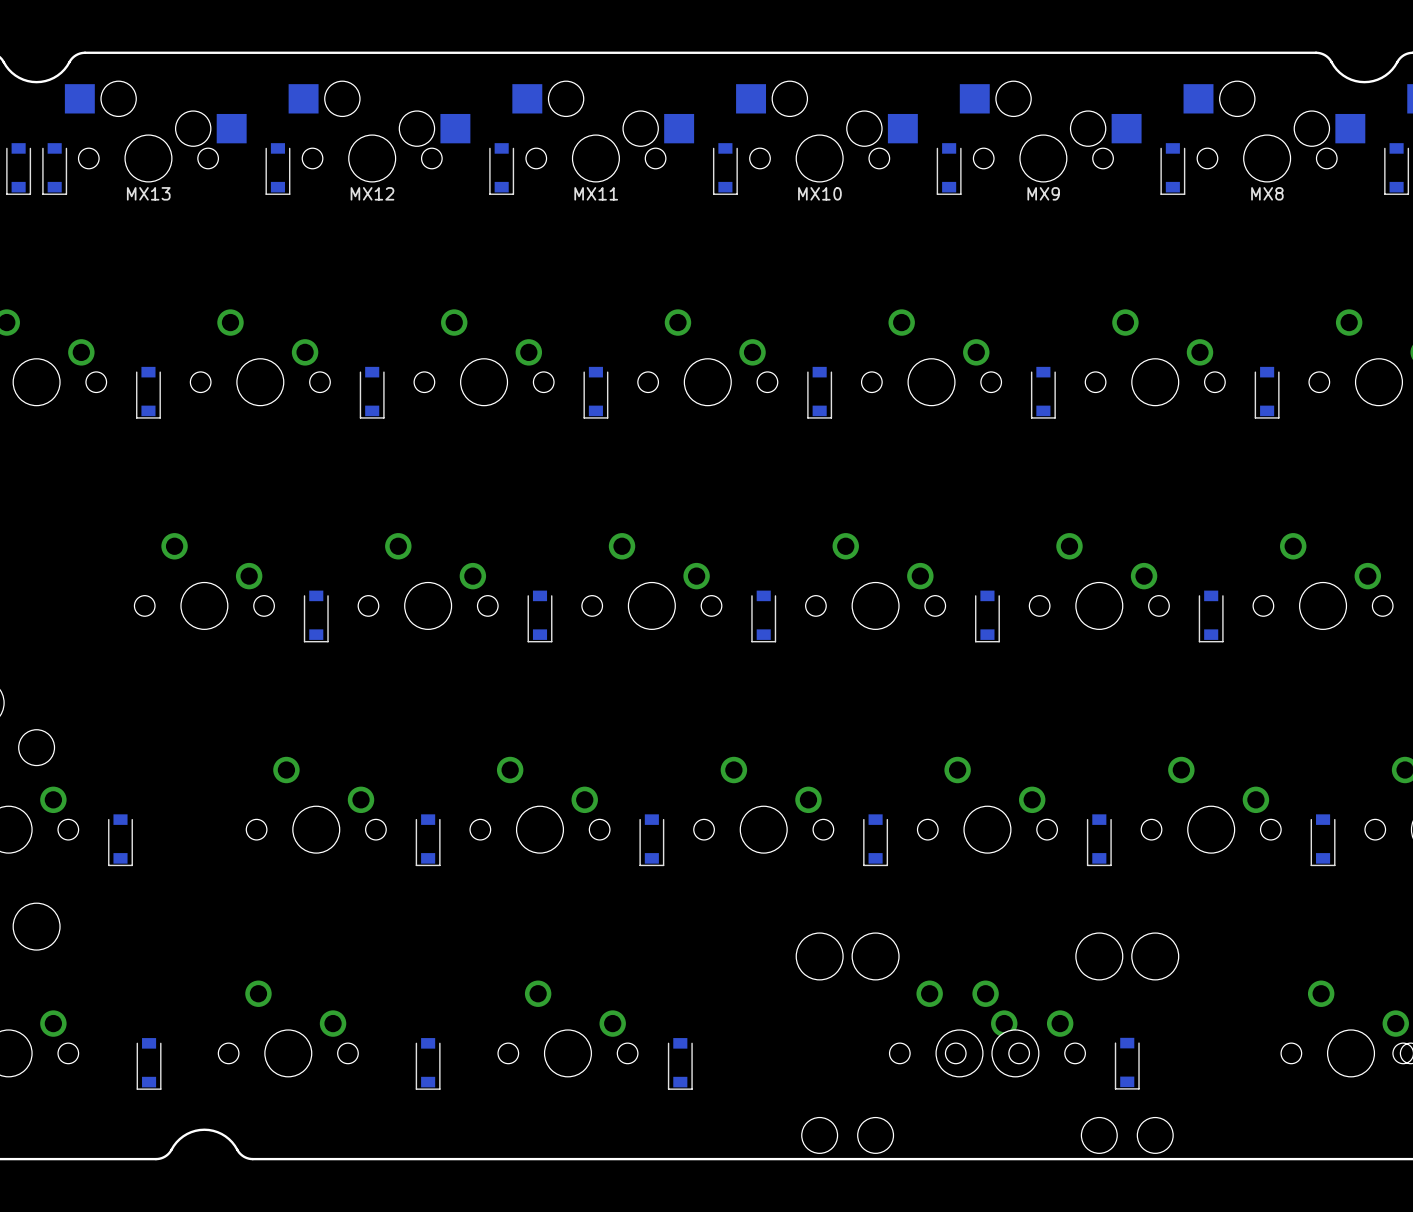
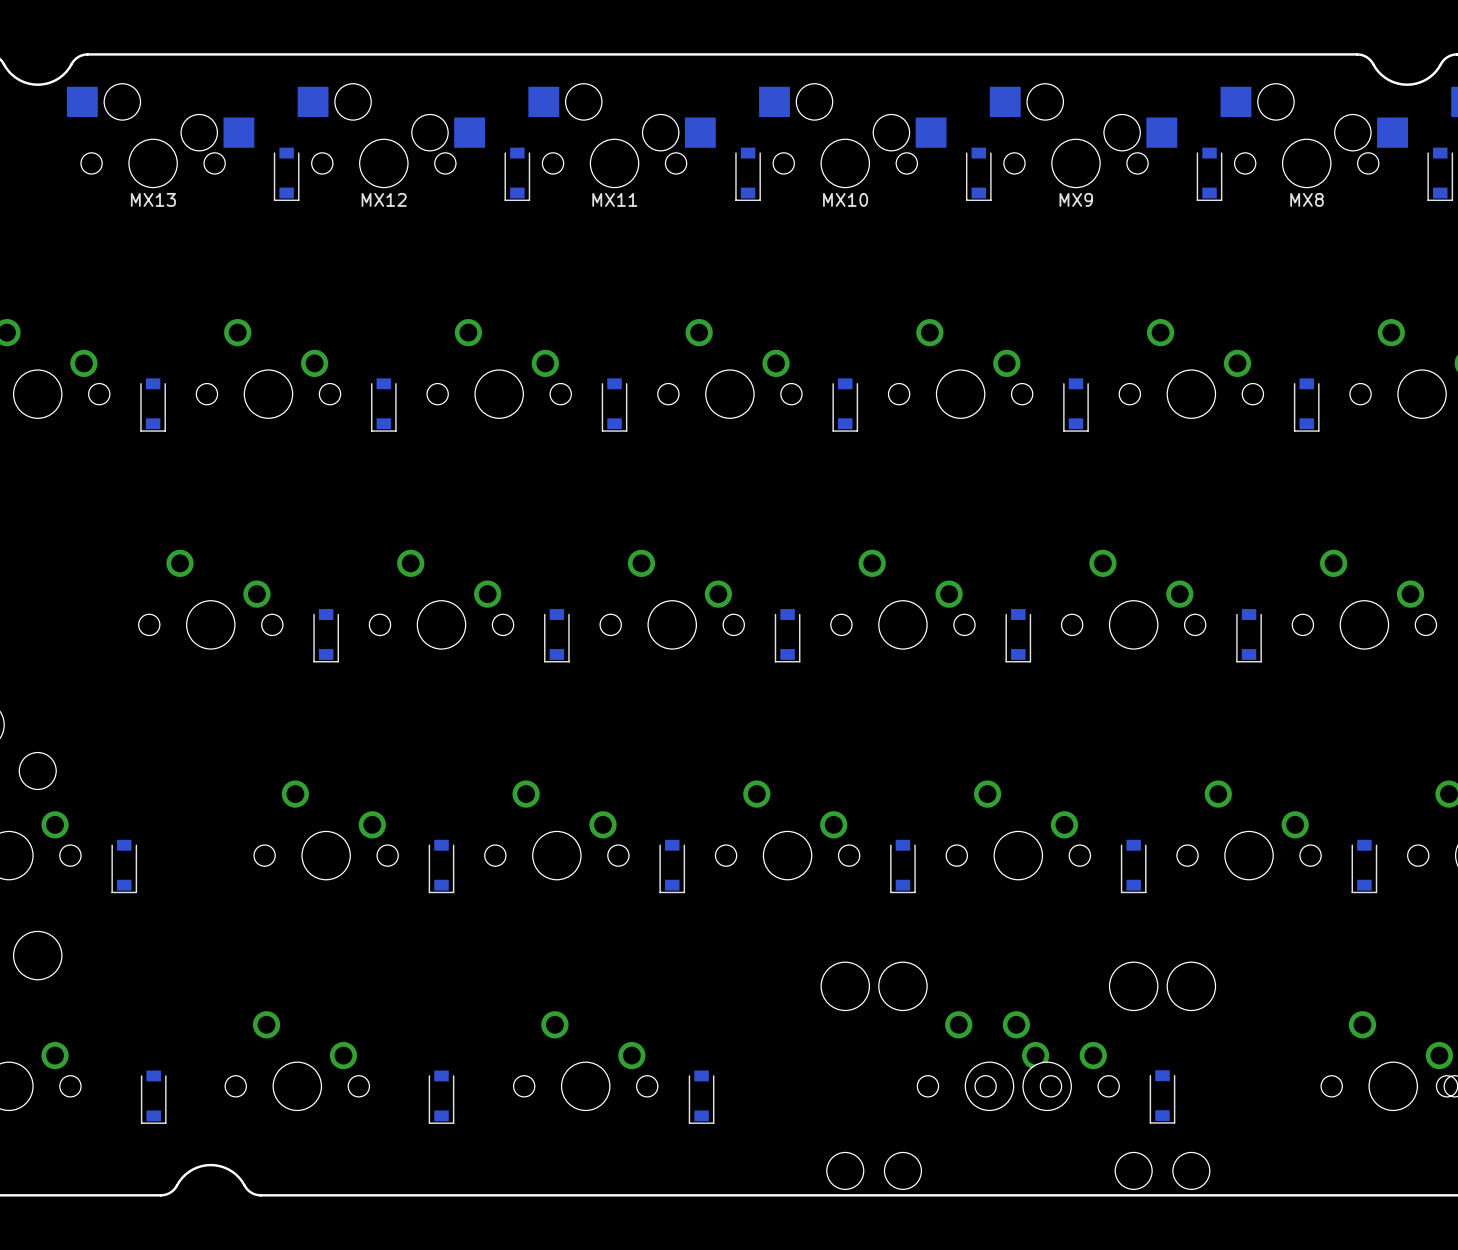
part: (18, 169) -> none
part: (54, 169) -> none

